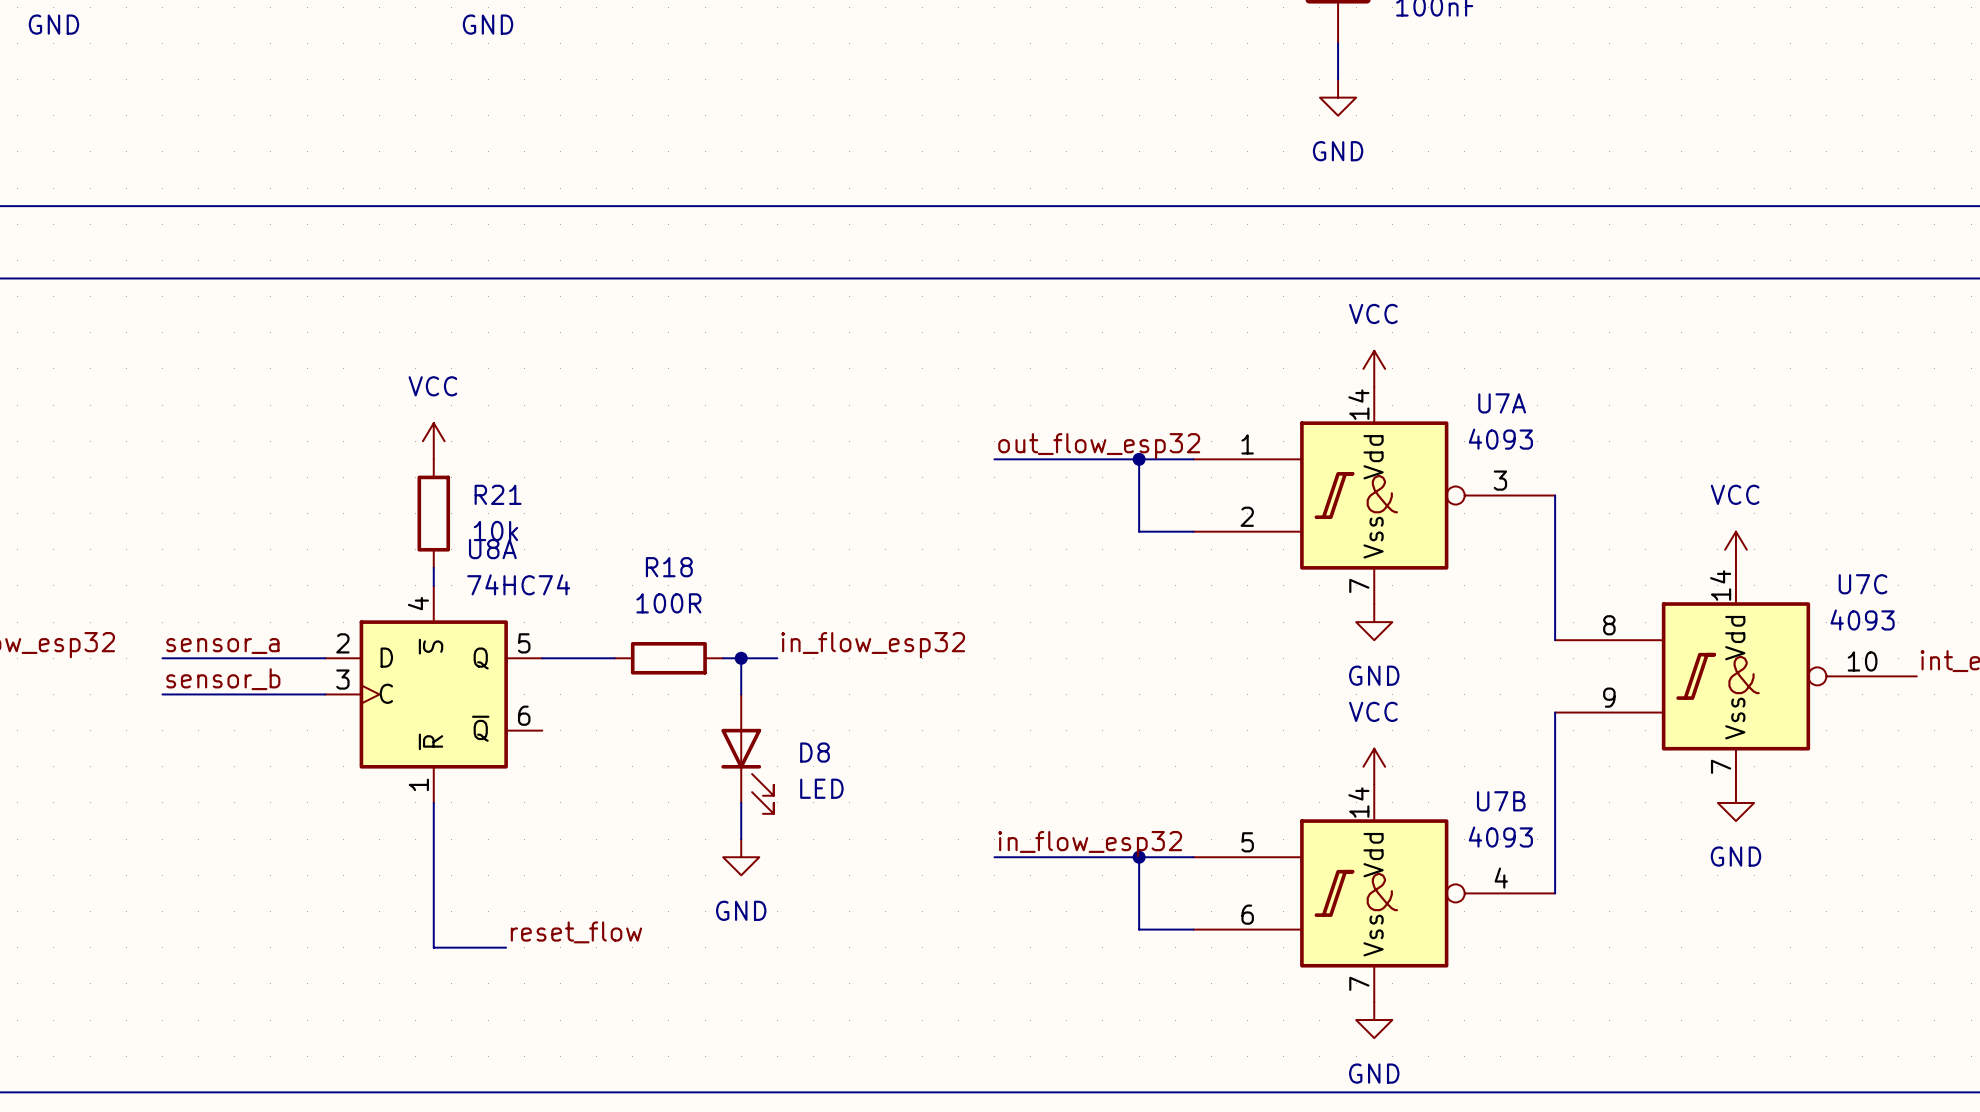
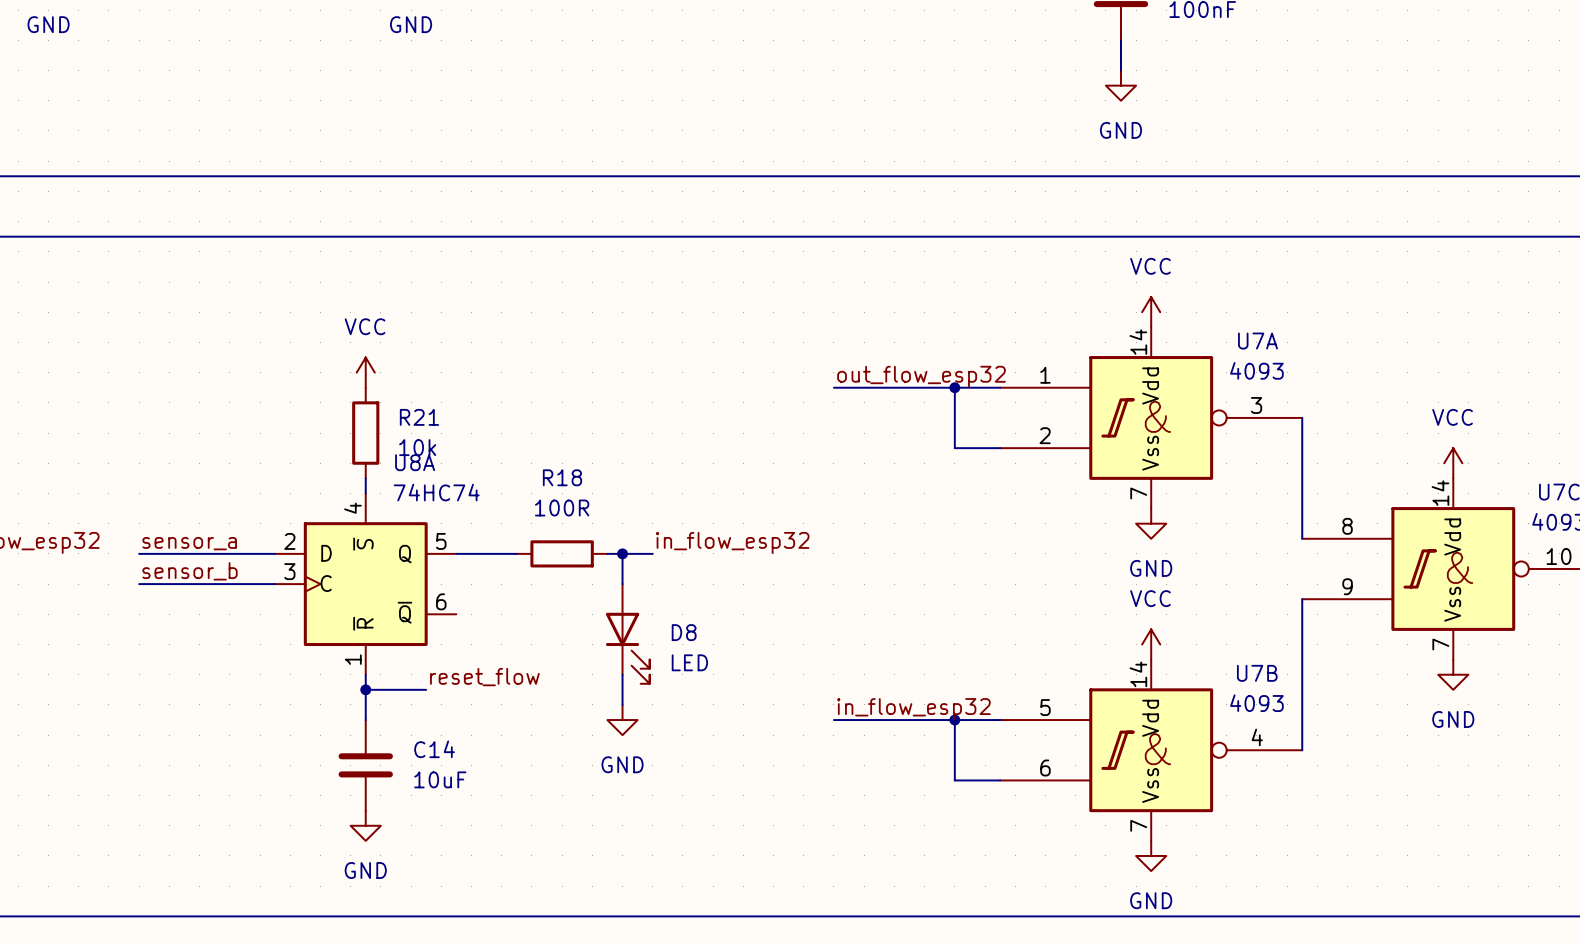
wire: none -> (365, 689) (426, 689)
junction: none -> (365, 689)
wire: (433, 857) (433, 947) (506, 947) -> none
C14: none -> 10uF (365, 765)
label position: reset_flow (576, 932) -> reset_flow (484, 677)
power symbol: none -> GND (365, 825)

